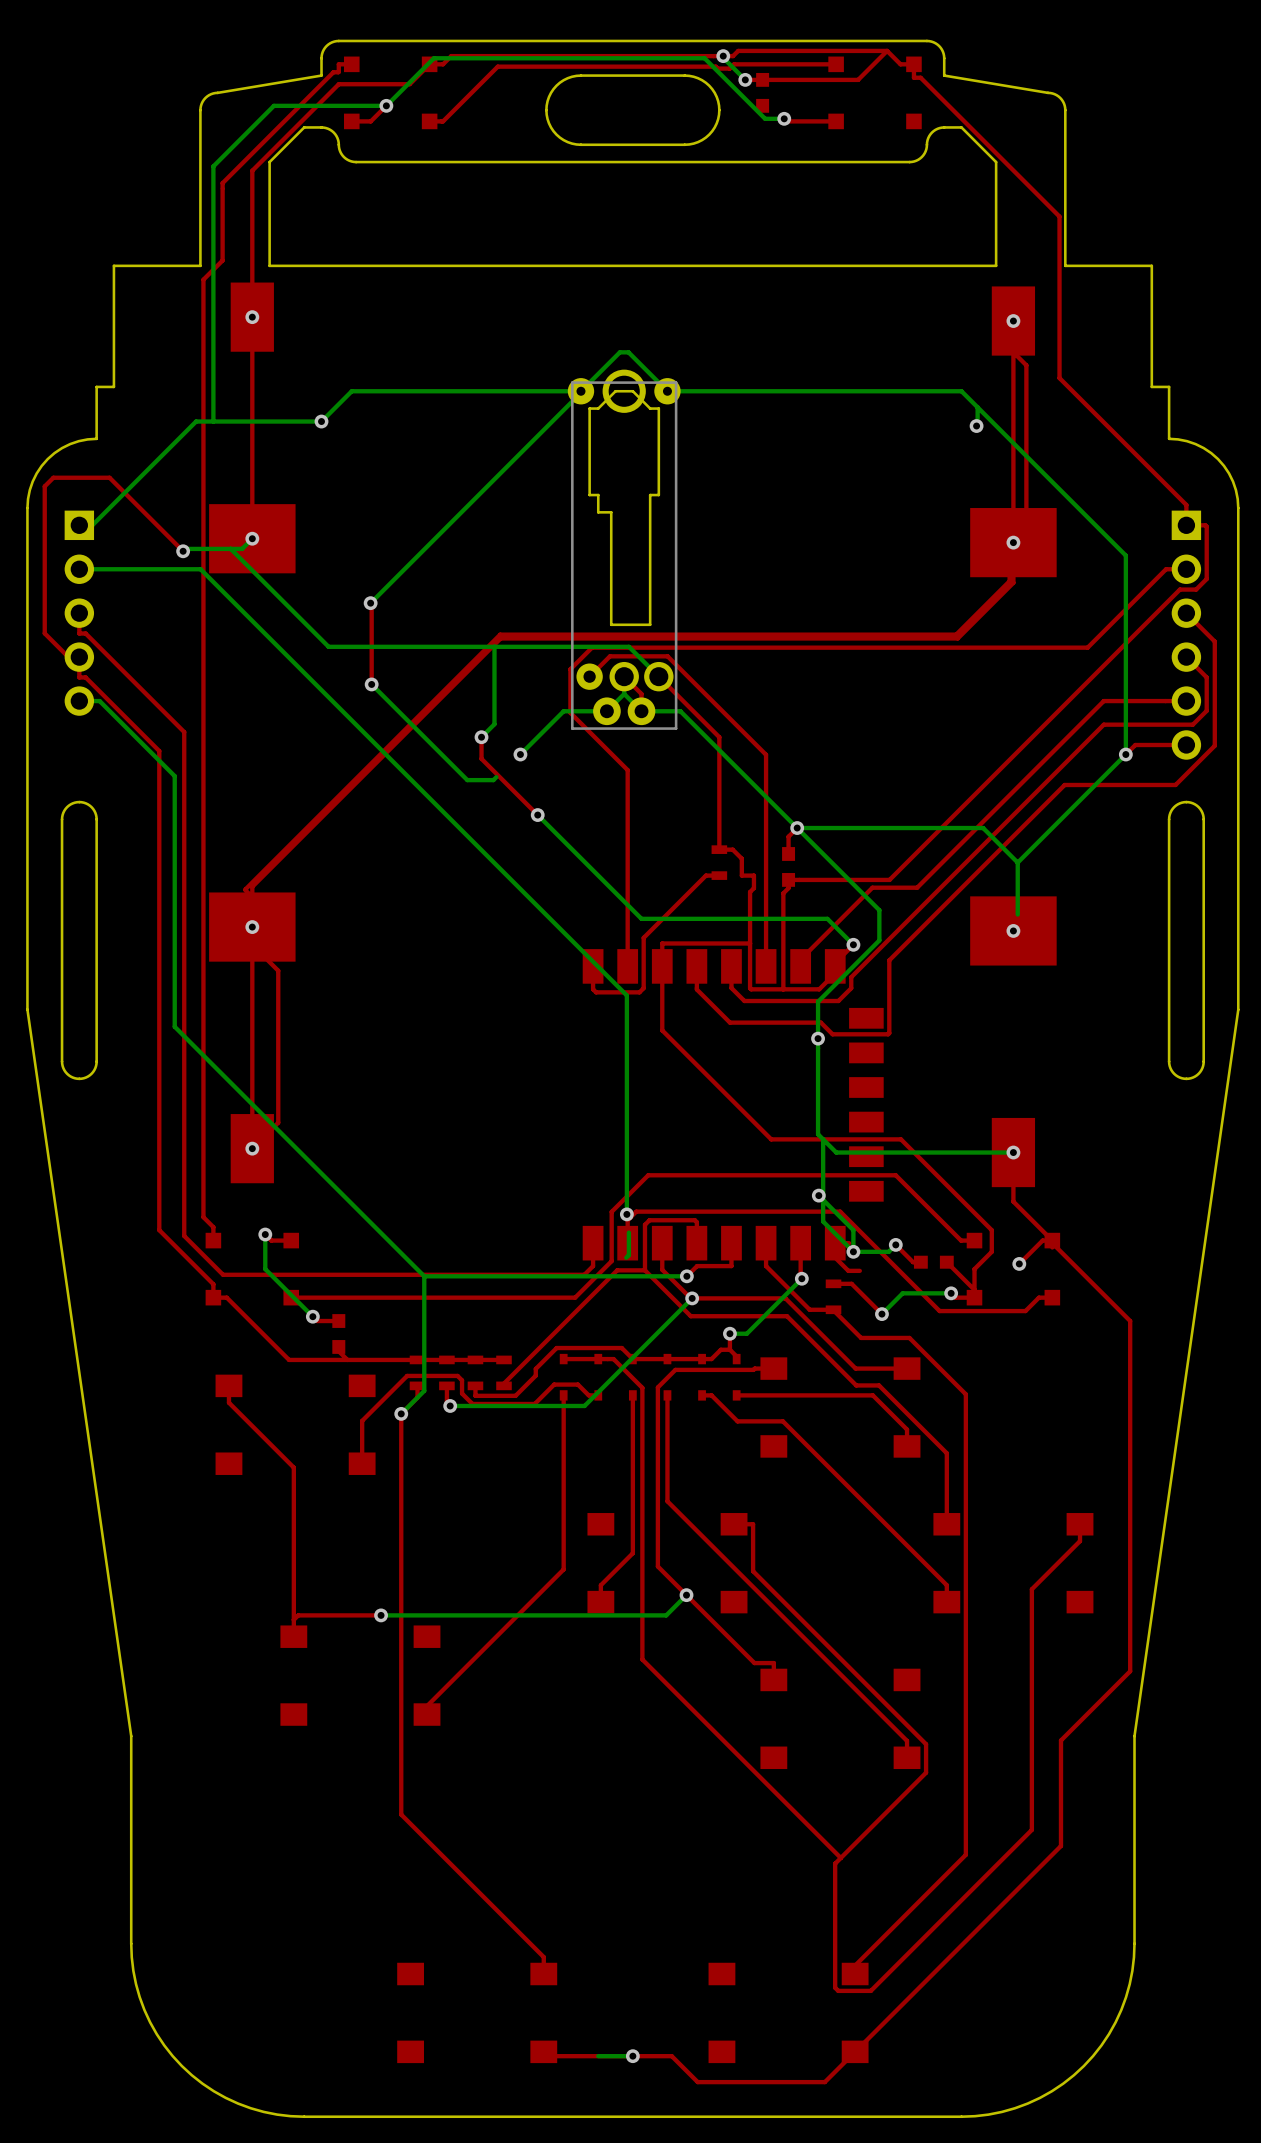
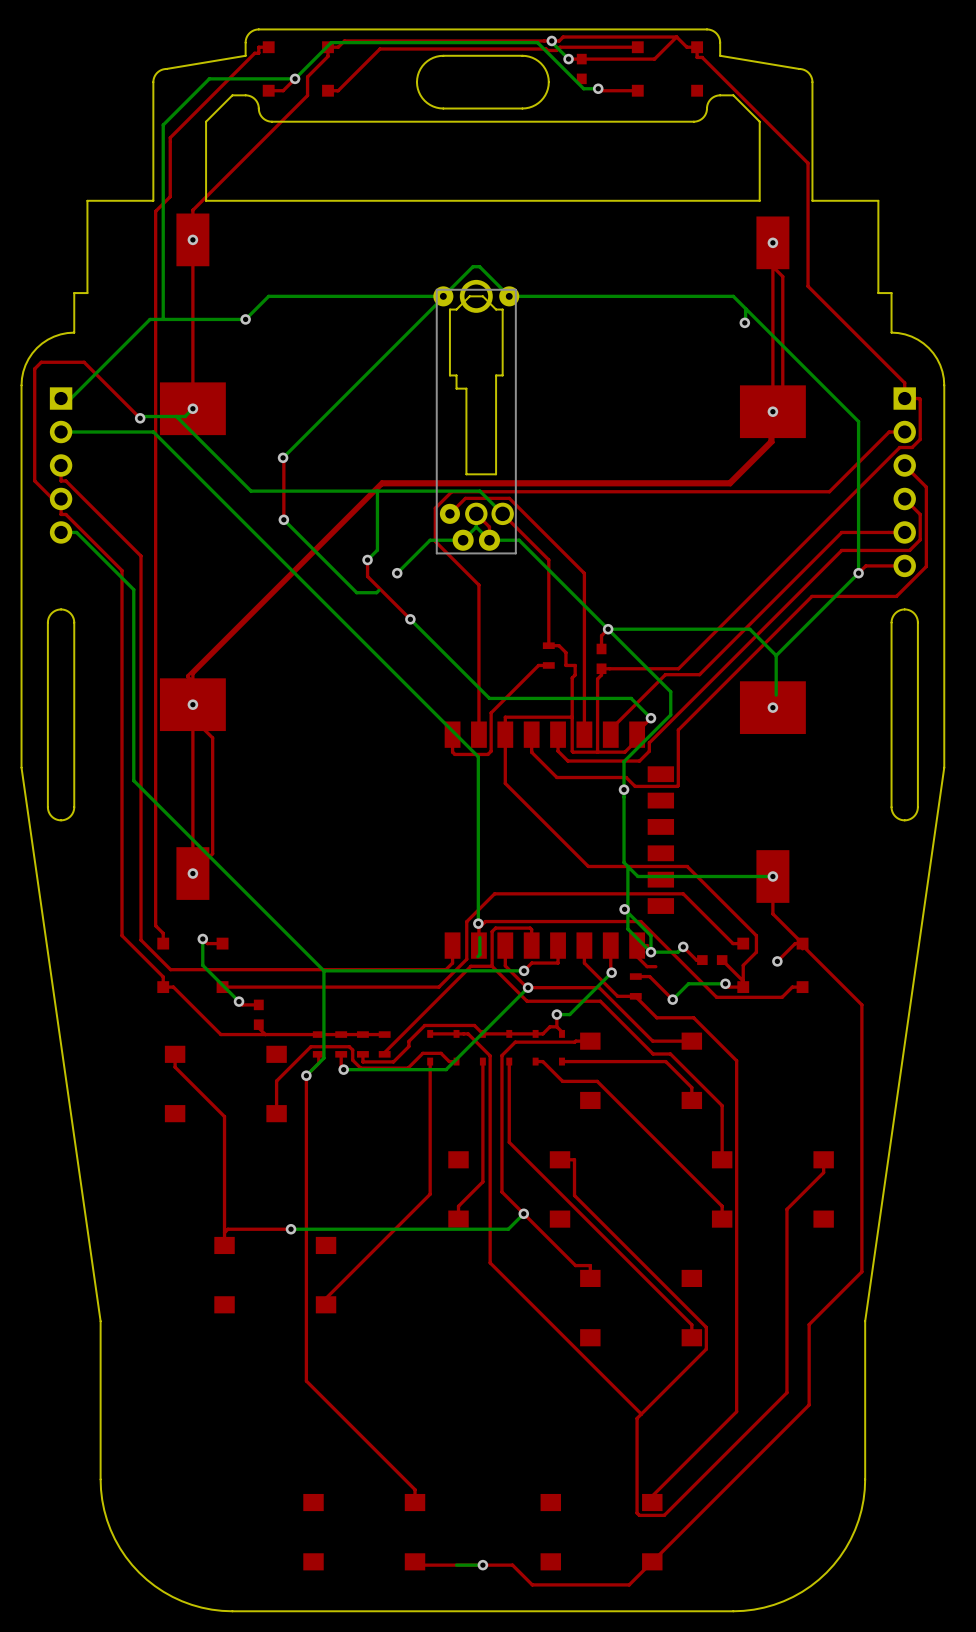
top track: (429, 64) (409, 84) (338, 84) (252, 170) (252, 278) -> (328, 47) (328, 56) (307, 76) (307, 95) (192, 210)

